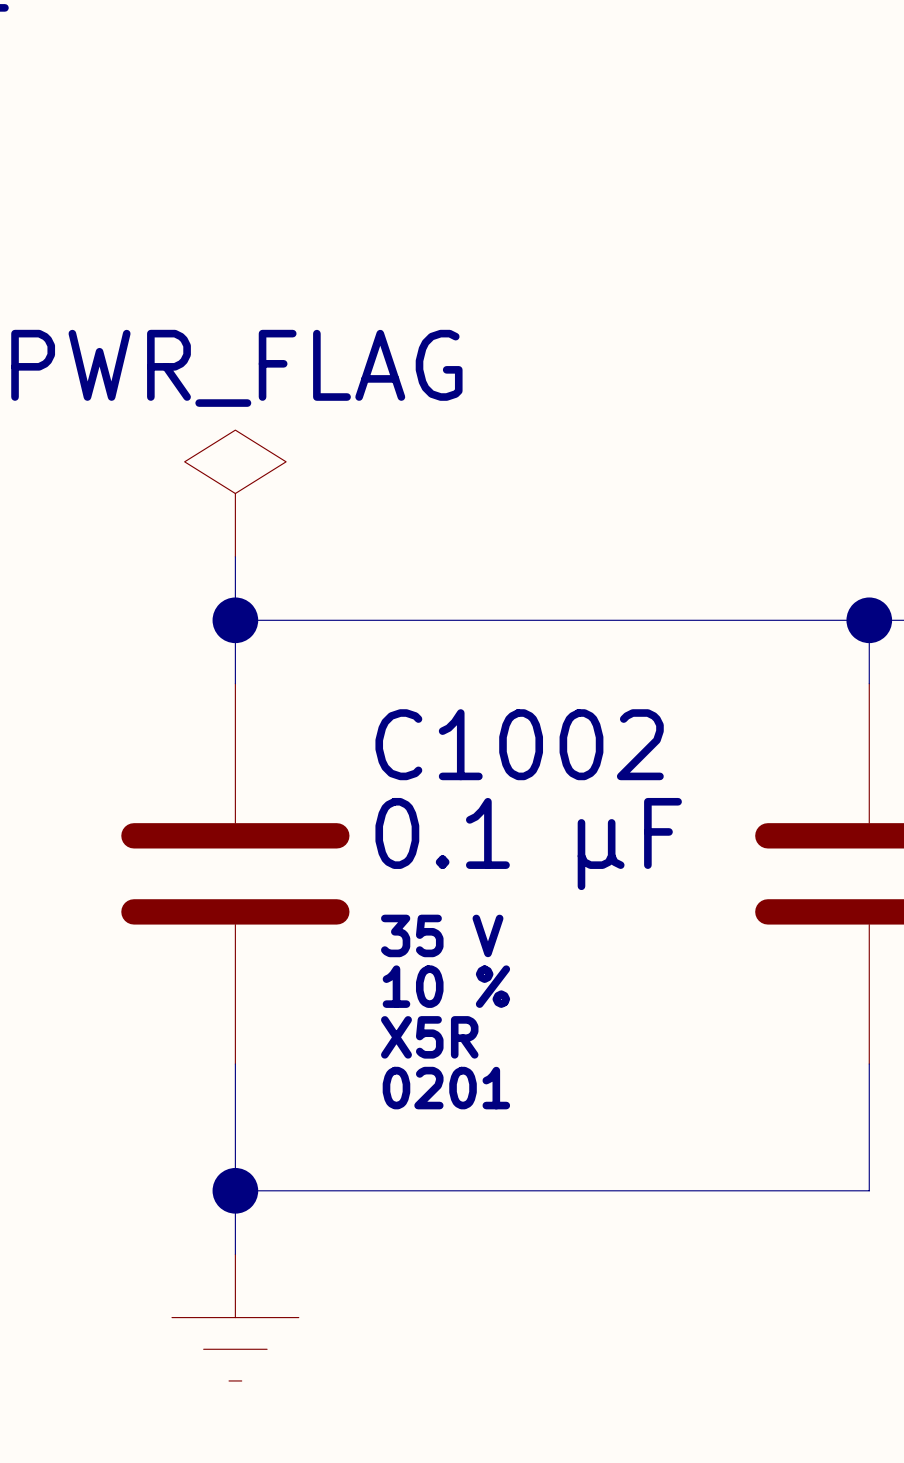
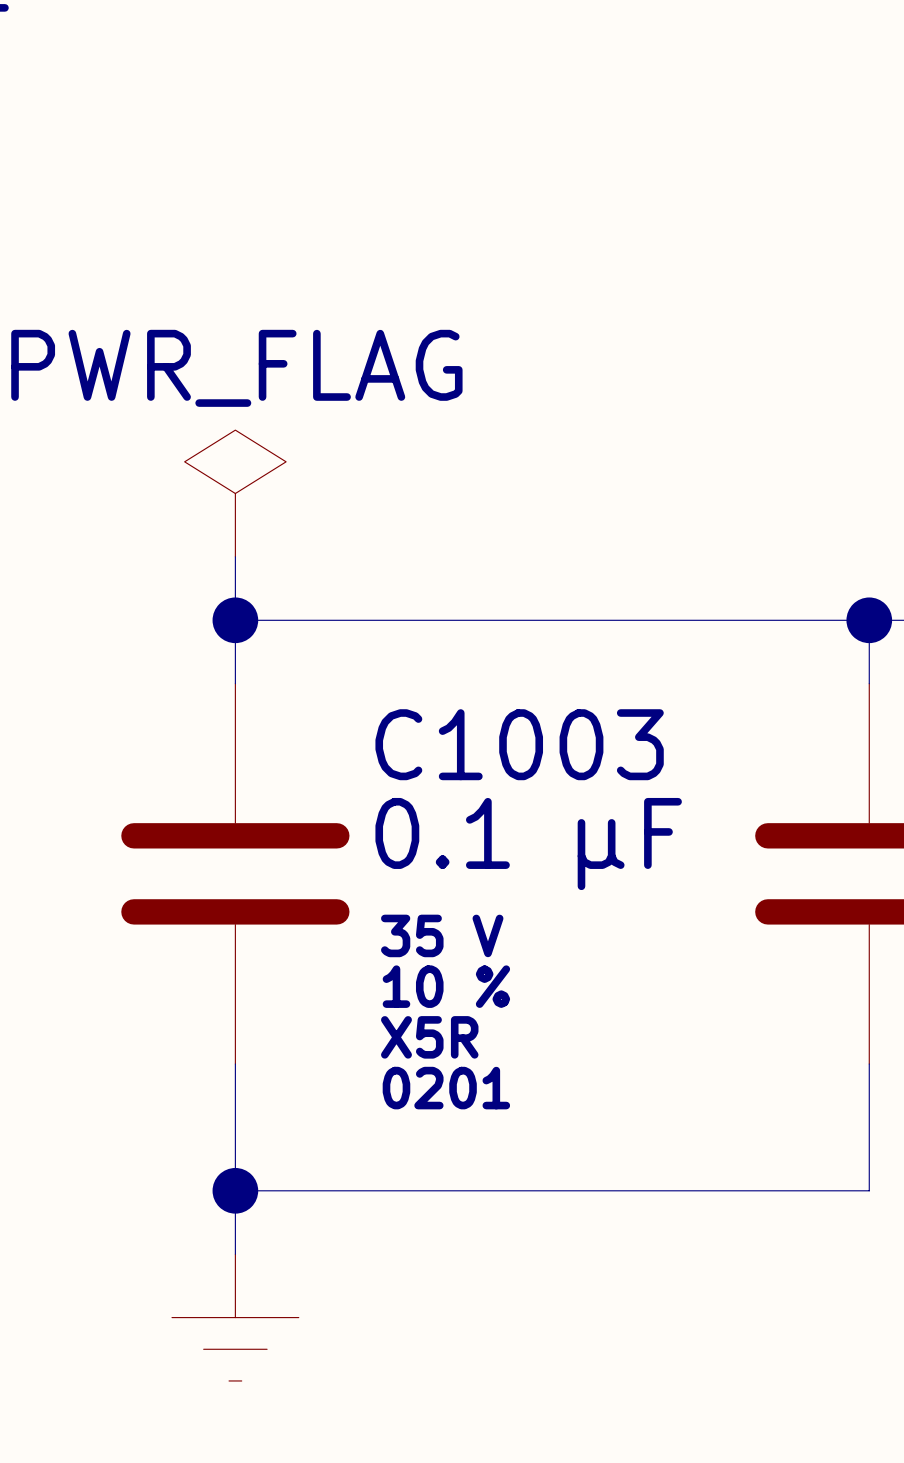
C1002 name: C1002 (519, 744) -> C1003 (519, 744)

